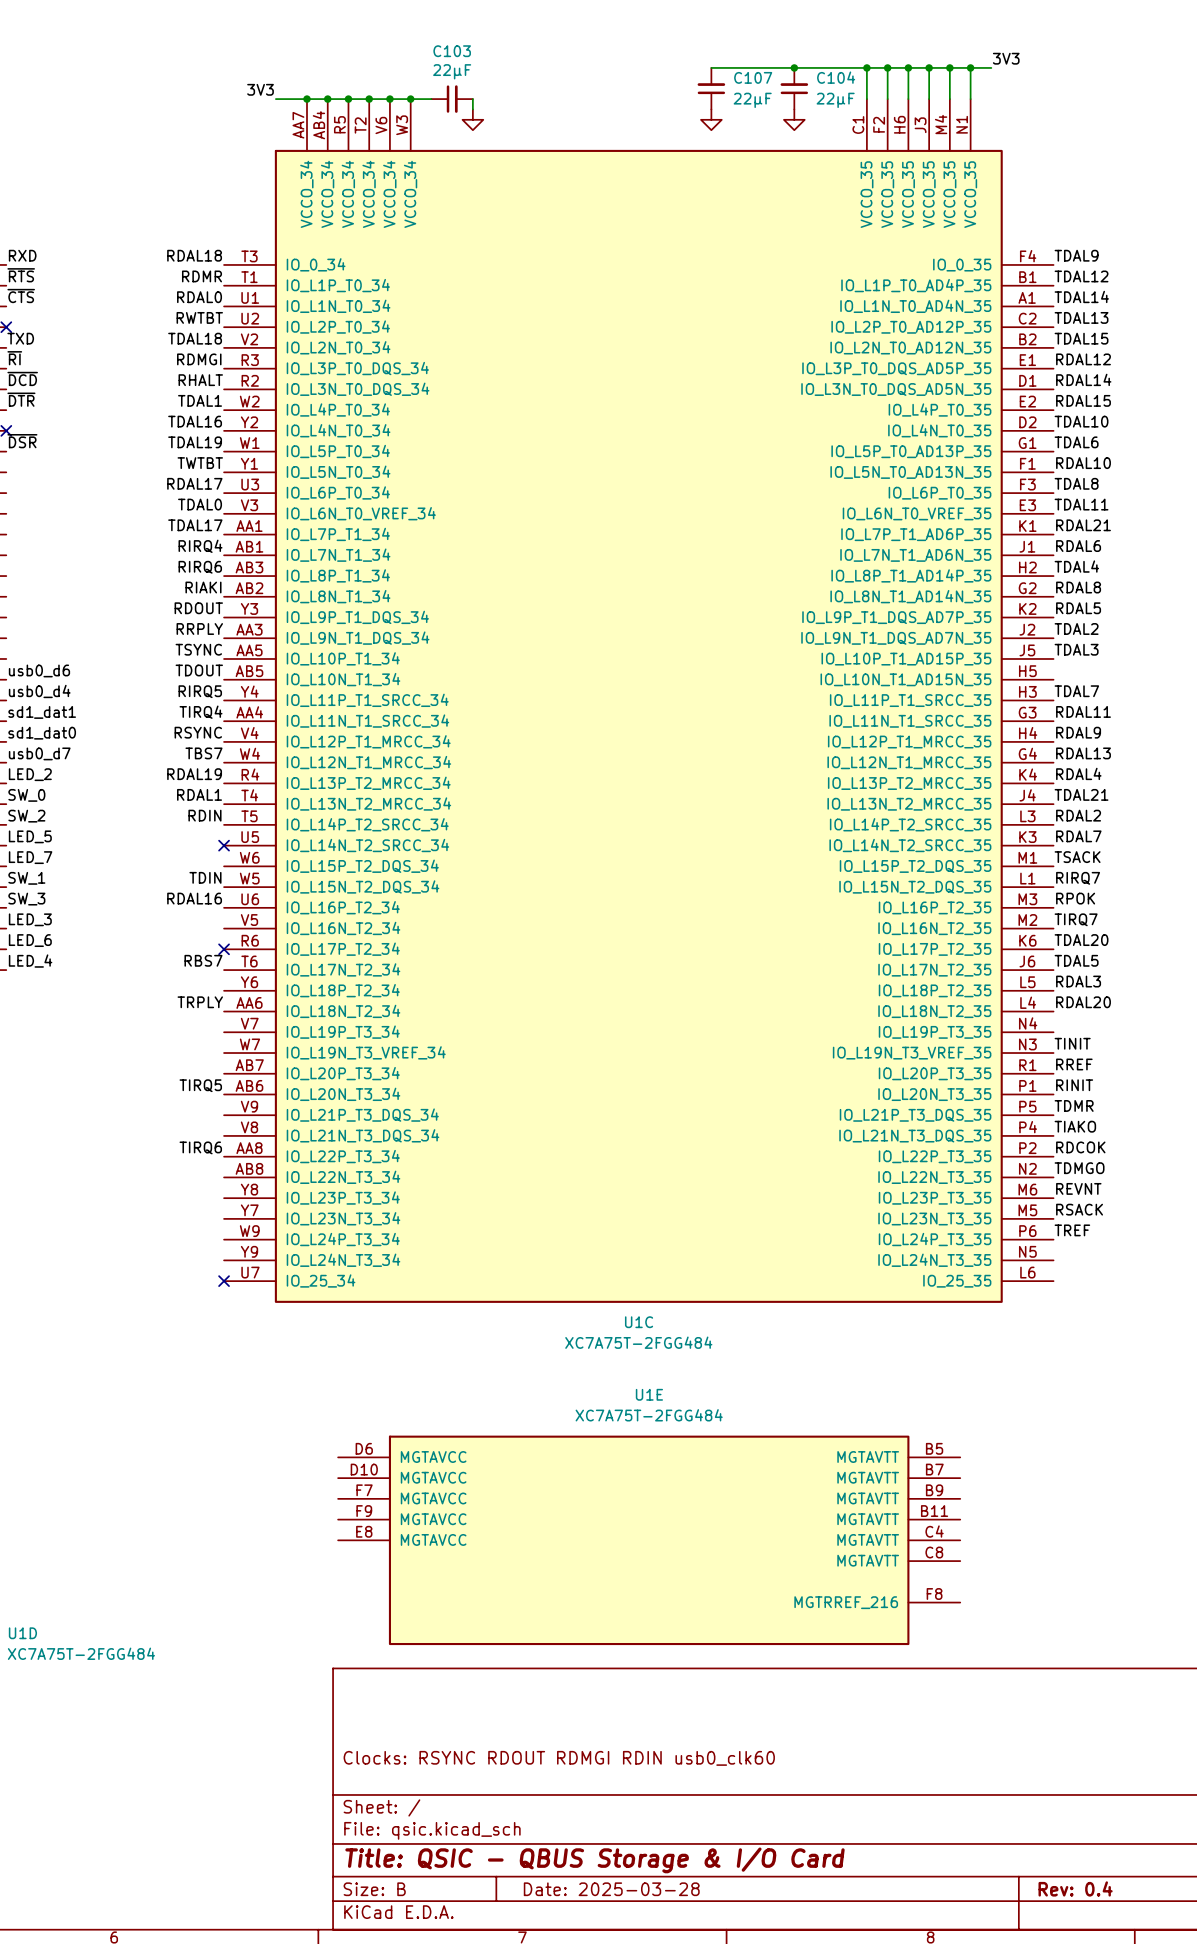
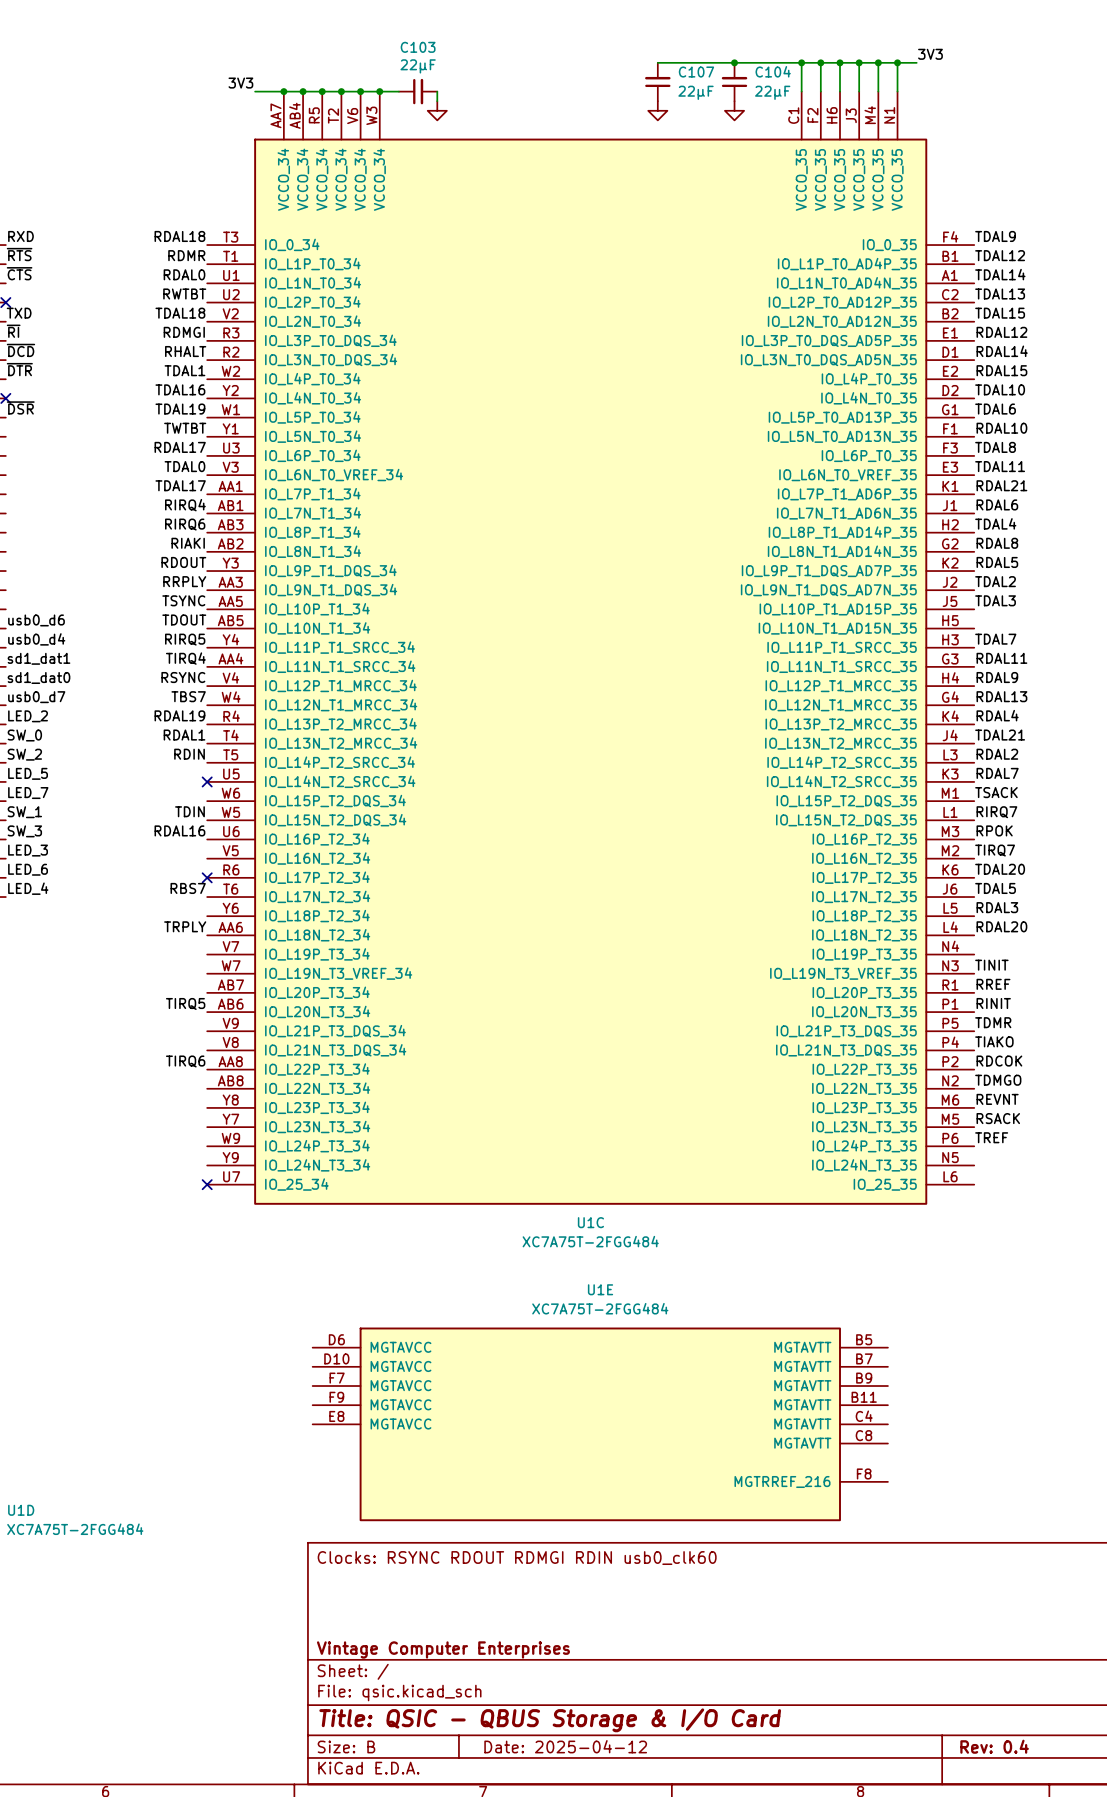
title block position: Clocks: RSYNC RDOUT RDMGI RDIN usb0_clk60 (559, 1758) -> Clocks: RSYNC RDOUT RDMGI RDIN usb0_clk60 (517, 1558)
title block: none -> Vintage Computer Enterprises (443, 1649)
title block: Date: 2025-03-28 (611, 1889) -> Date: 2025-04-12 (565, 1746)

